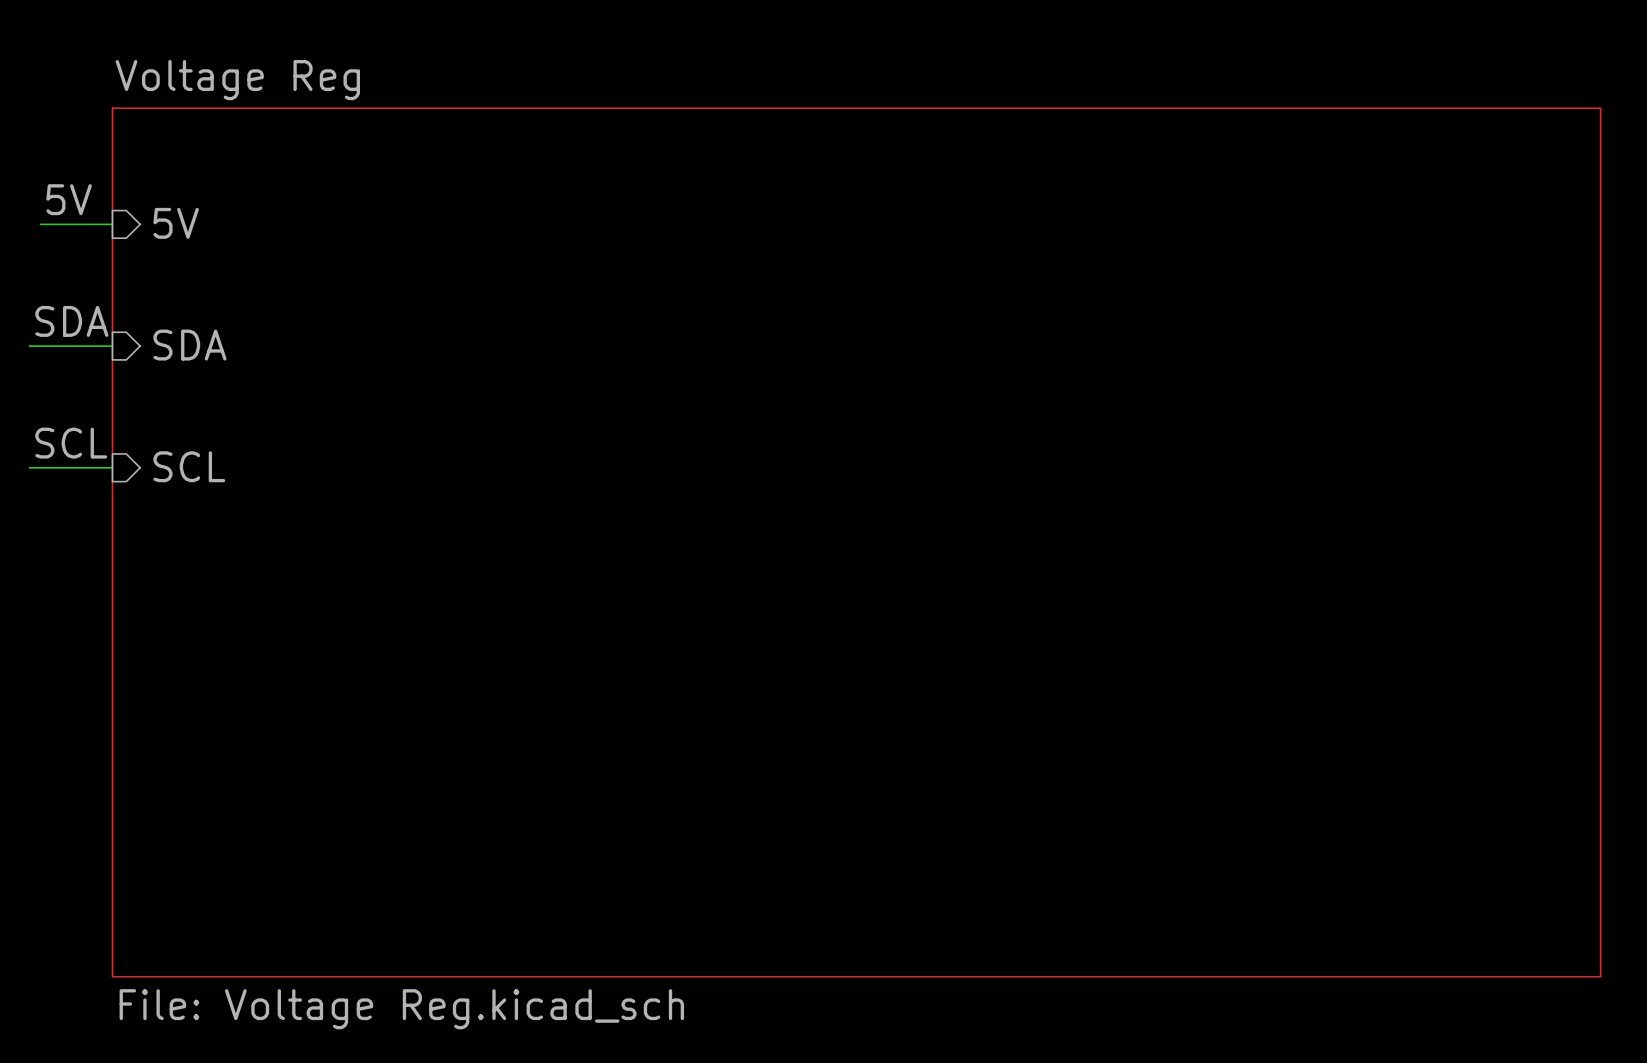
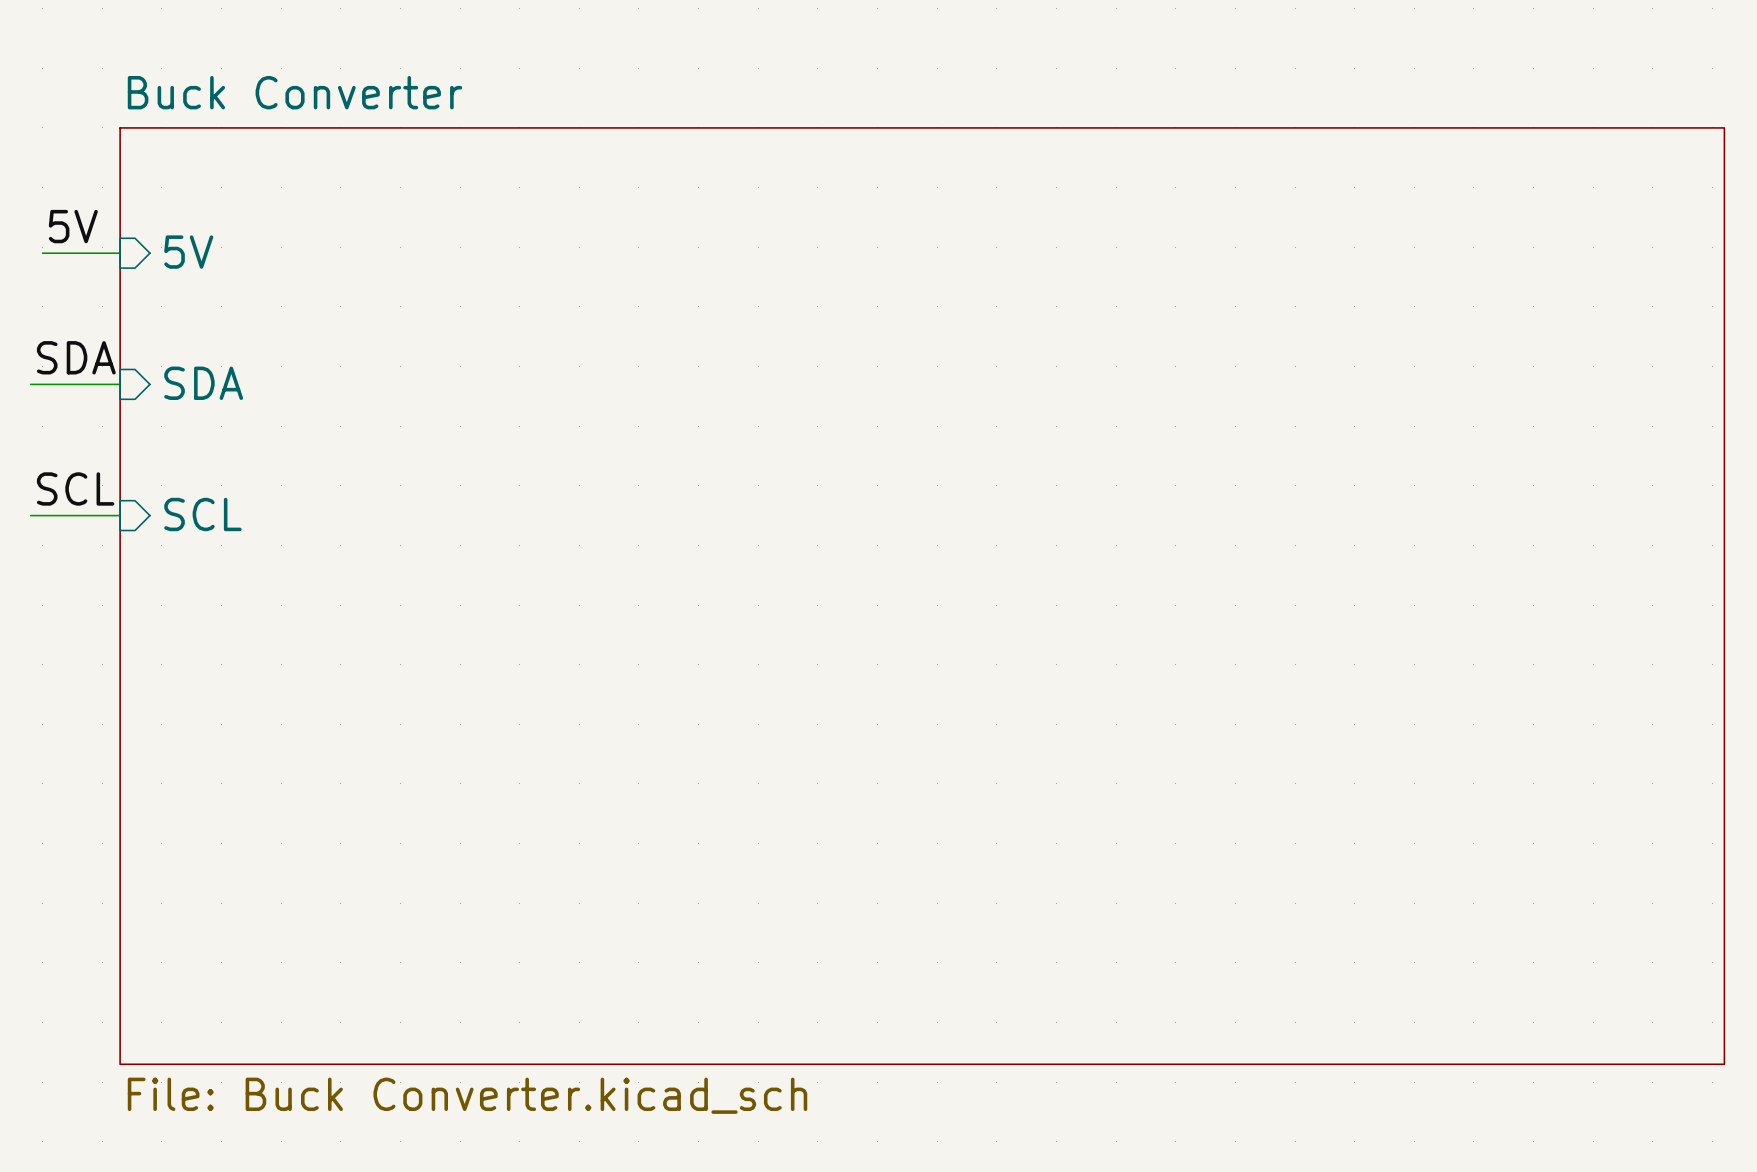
sheet Voltage Reg name: Voltage Reg (237, 80) -> Buck Converter (294, 92)
sheet Voltage Reg value: File: Voltage Reg.kicad_sch (401, 1009) -> File: Buck Converter.kicad_sch (467, 1095)

